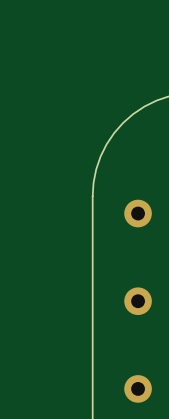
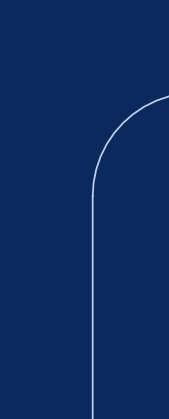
via: (138, 213) -> none
via: (138, 301) -> none
via: (138, 388) -> none

